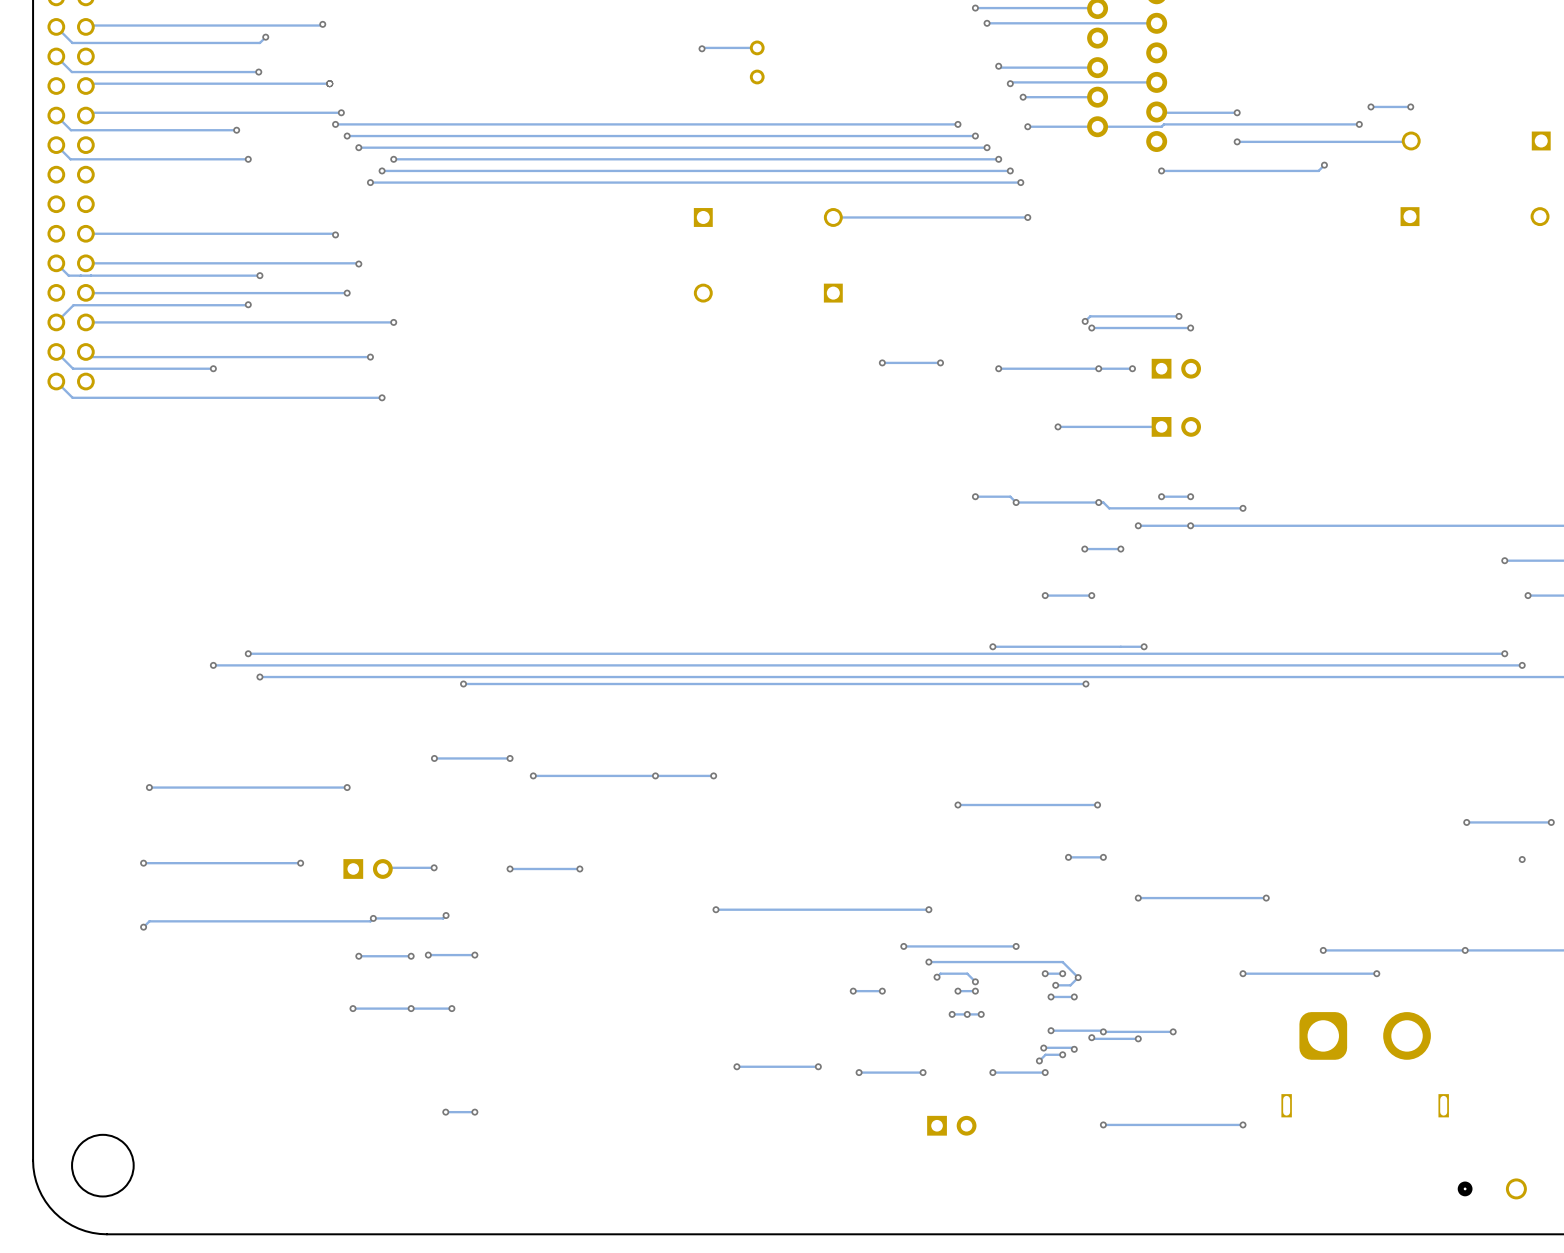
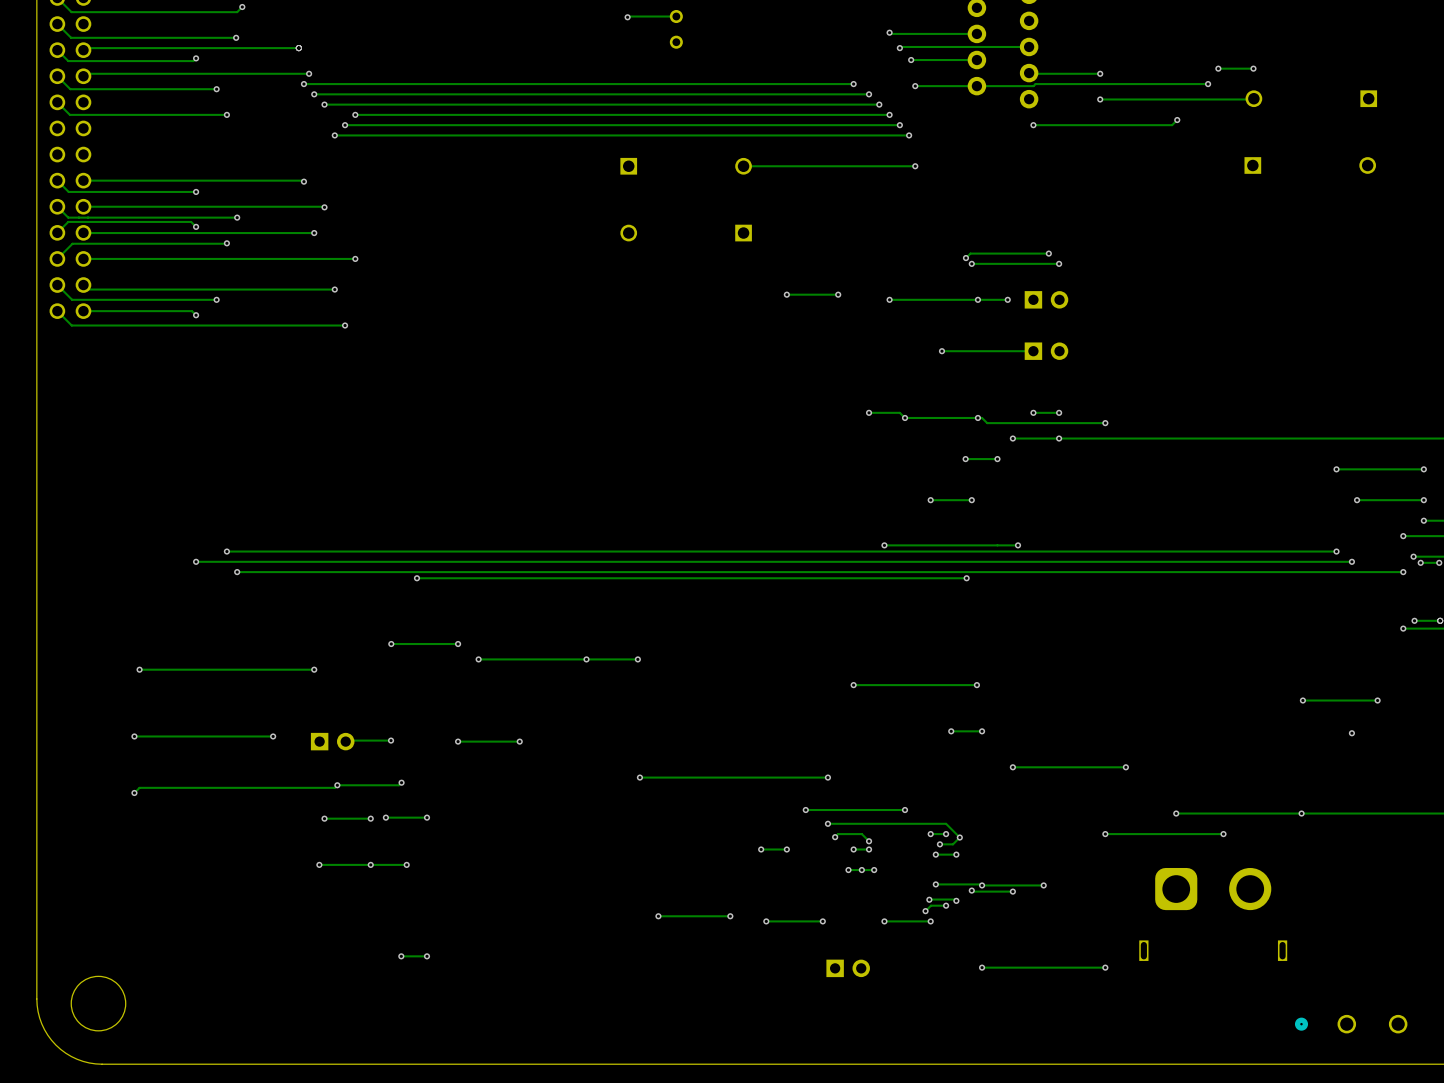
track: none -> (57, 50) (68, 61) (193, 61) (196, 58)
via: none -> (196, 58)
track: none -> (57, 180) (68, 191) (196, 191)
via: none -> (196, 191)
track: none -> (196, 226) (191, 221) (68, 221) (57, 232)
via: none -> (196, 226)
via: (213, 368) -> none
track: none -> (216, 299) (196, 299)
via: none -> (216, 299)
track: none -> (83, 311) (191, 311) (196, 315)
via: none -> (196, 315)

